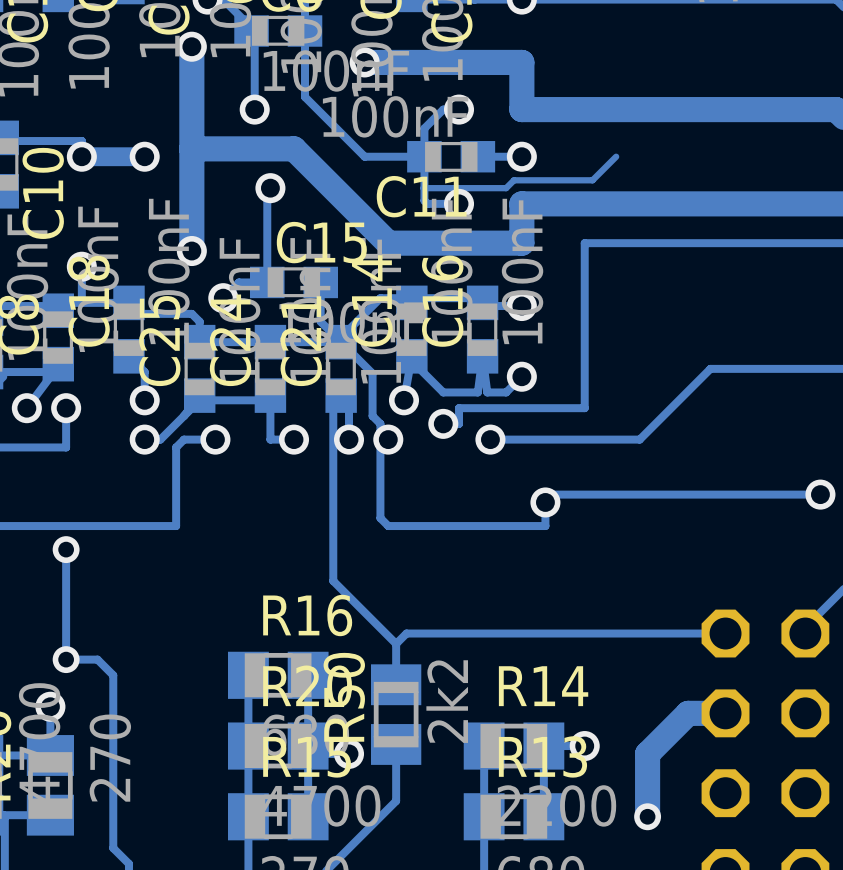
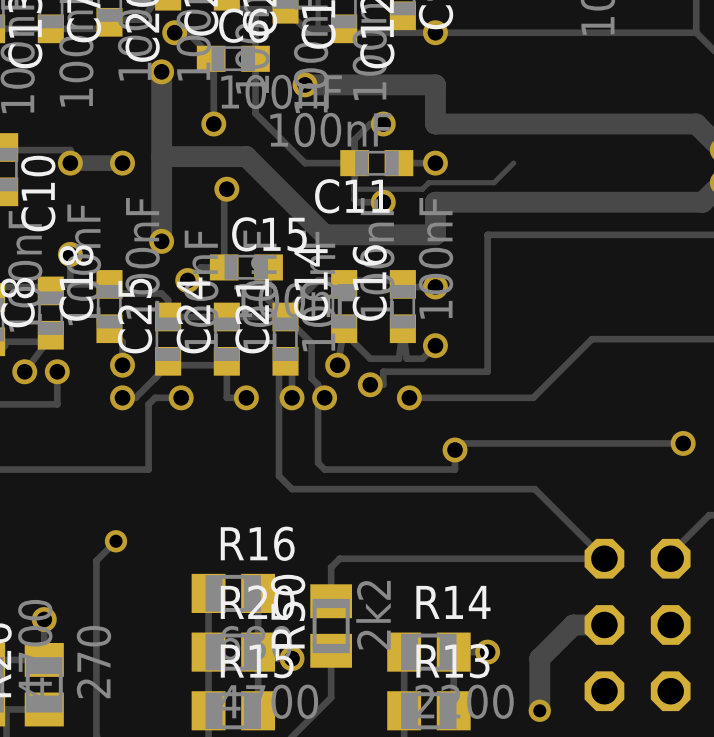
track: (333, 533) (333, 581) (396, 643) -> (278, 476) (292, 489) (534, 489) (604, 558)
track: (66, 549) (66, 659) (97, 659) (113, 675) -> (115, 541) (96, 560) (96, 593)
via: (66, 549) -> none
via: none -> (115, 541)
via: (66, 659) -> none

